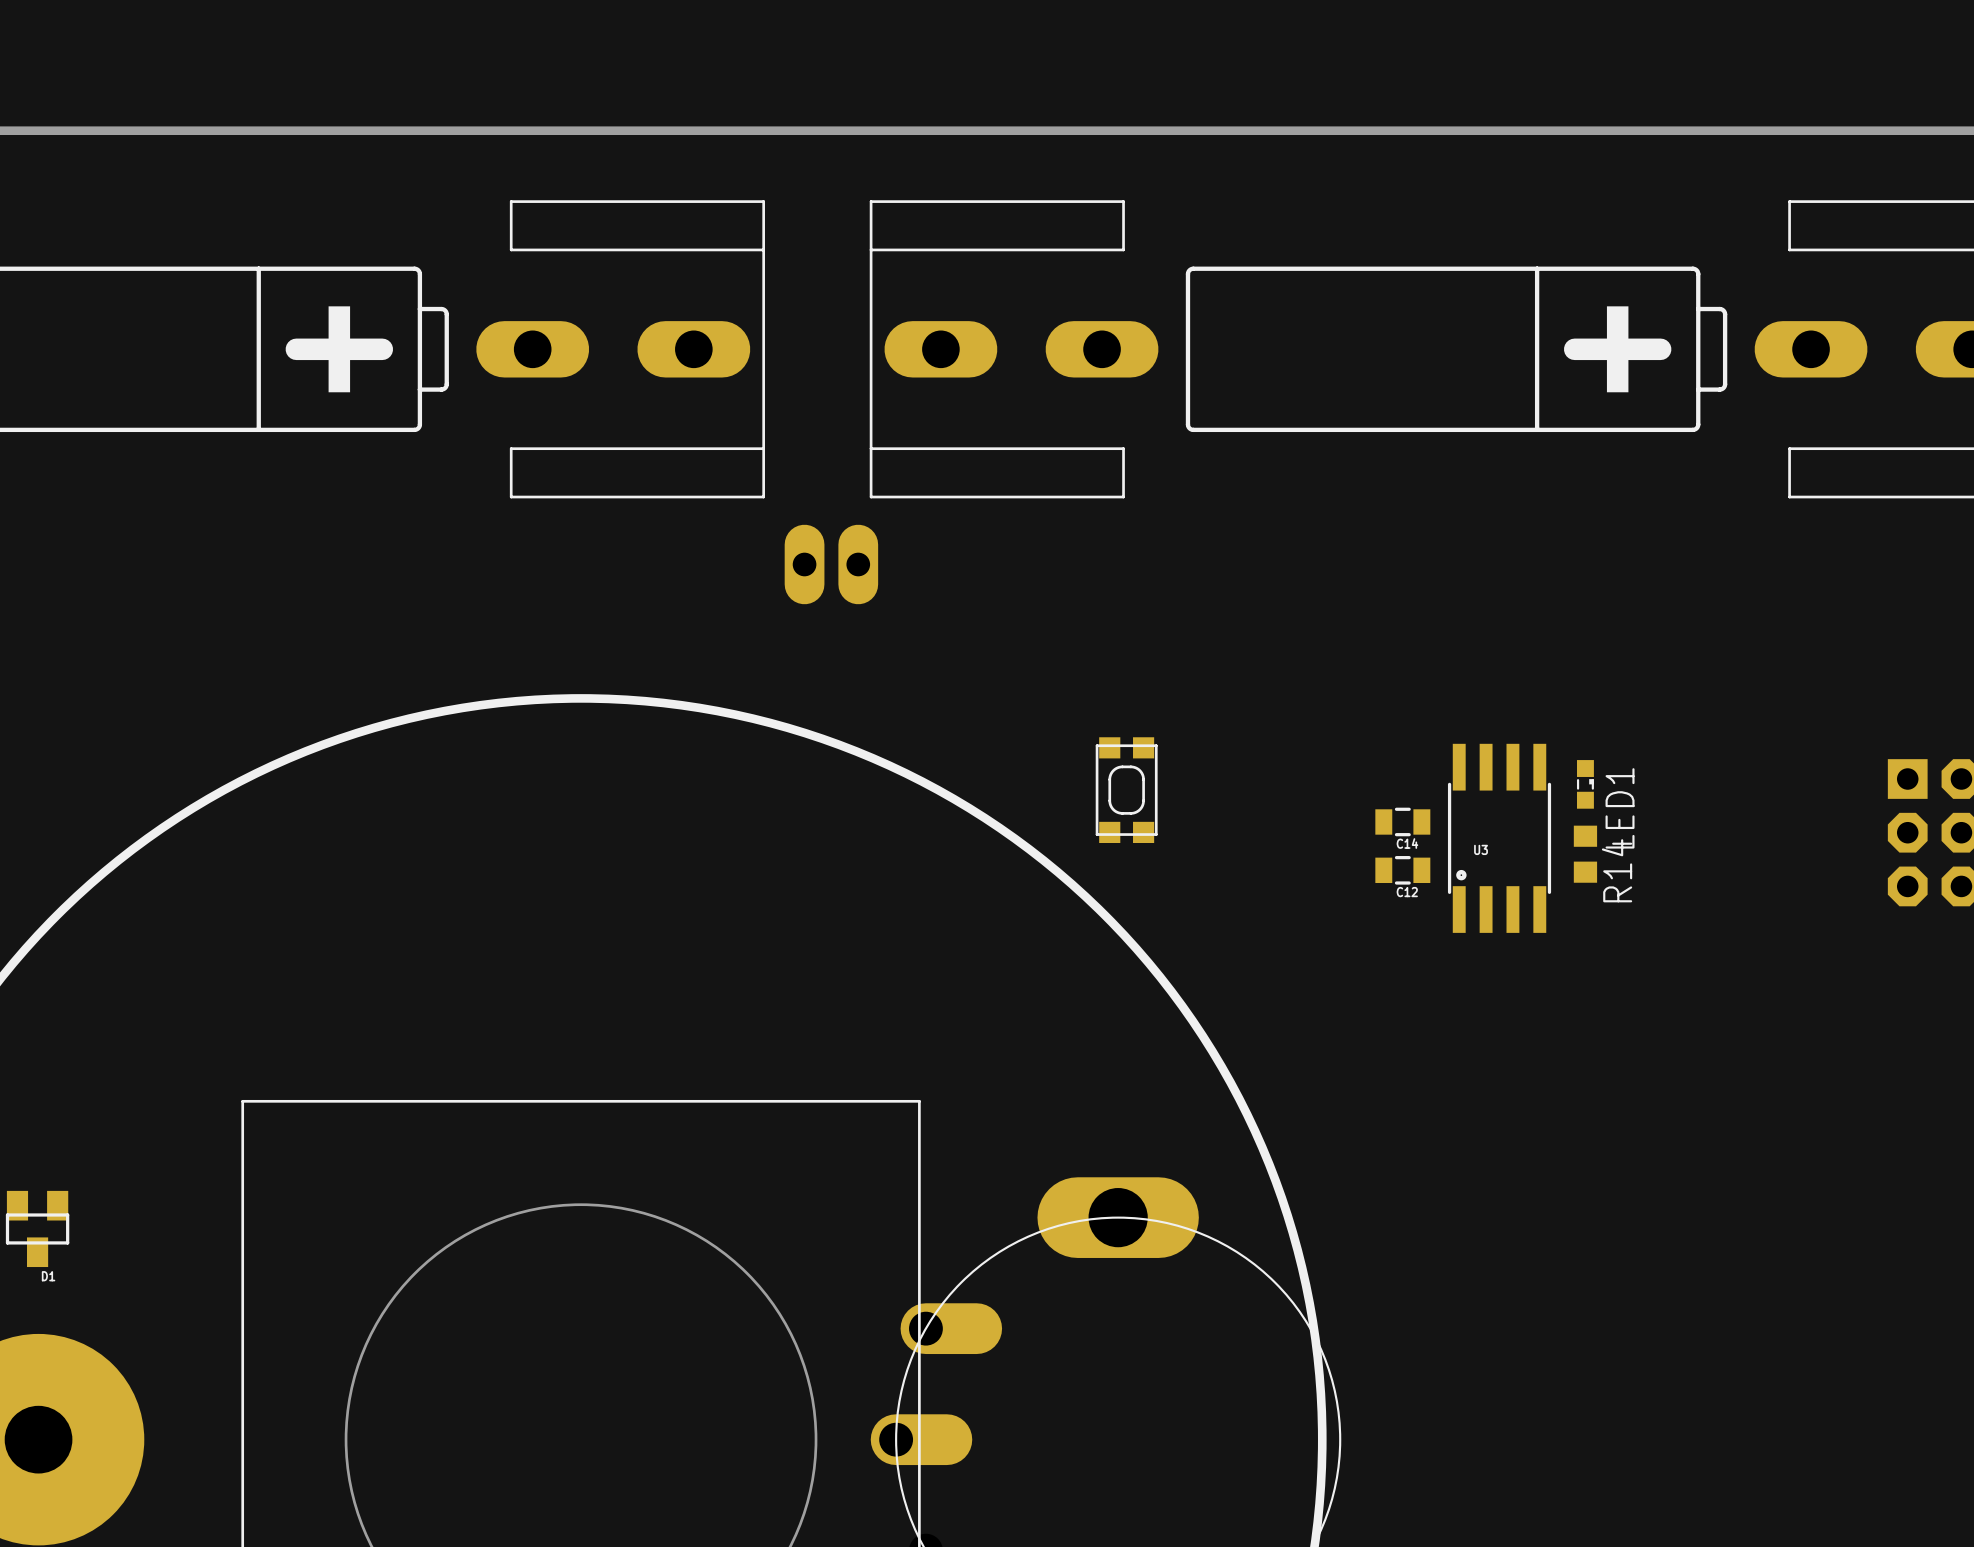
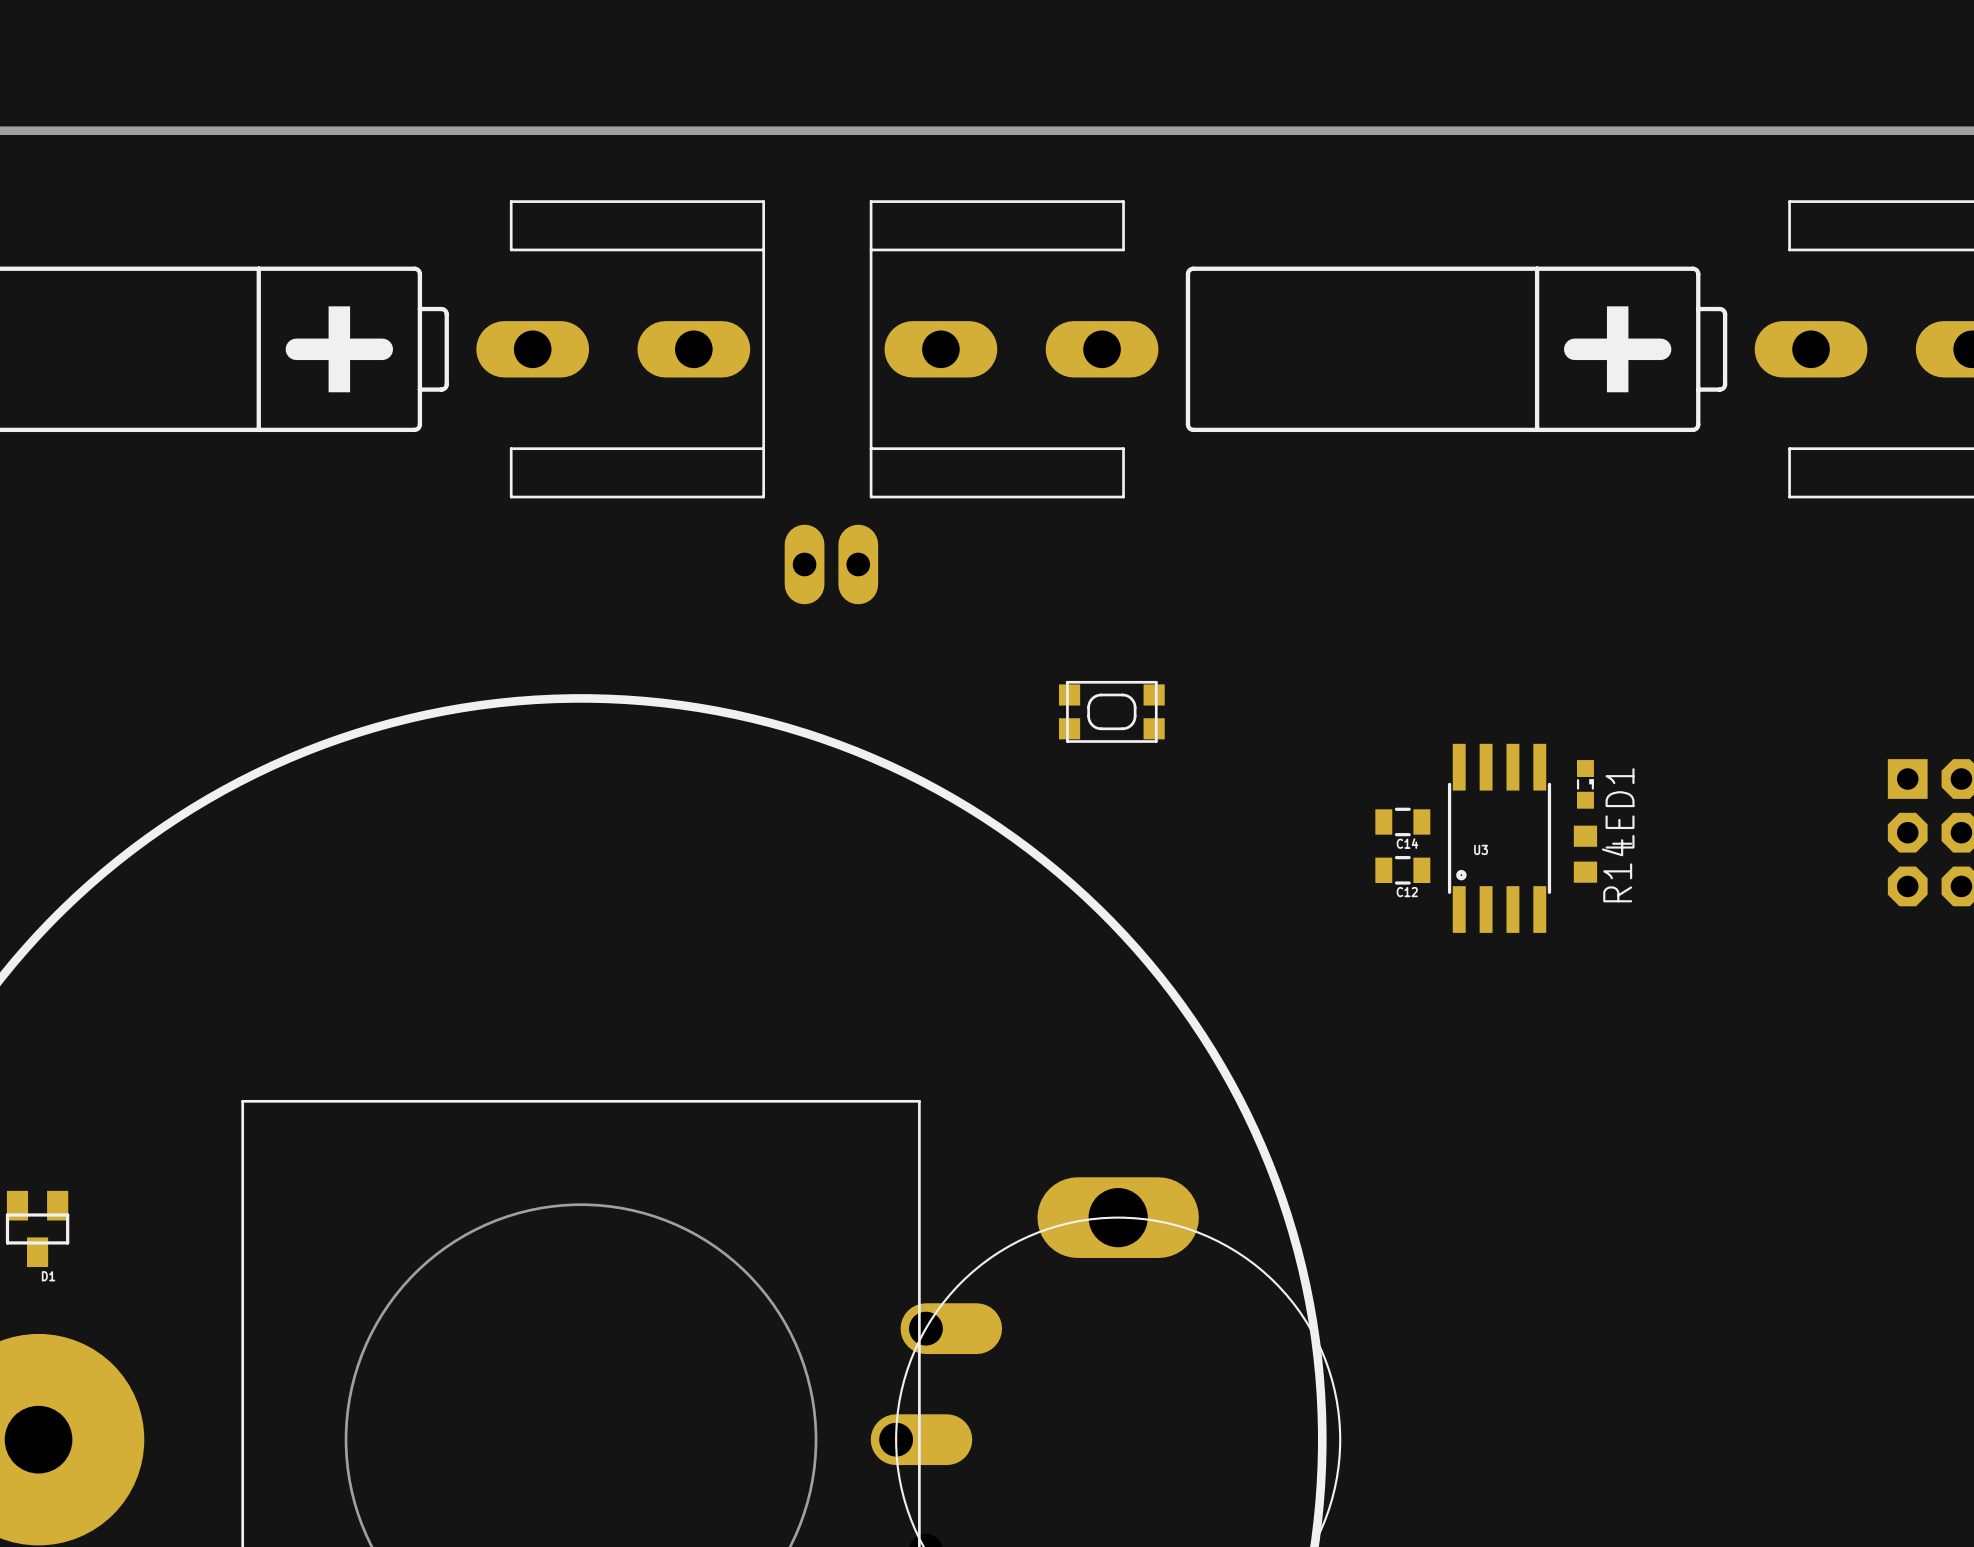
part rotation: 0° (1126, 790) -> 90° clockwise (1111, 711)
part position: (1126, 790) -> (1111, 711)

